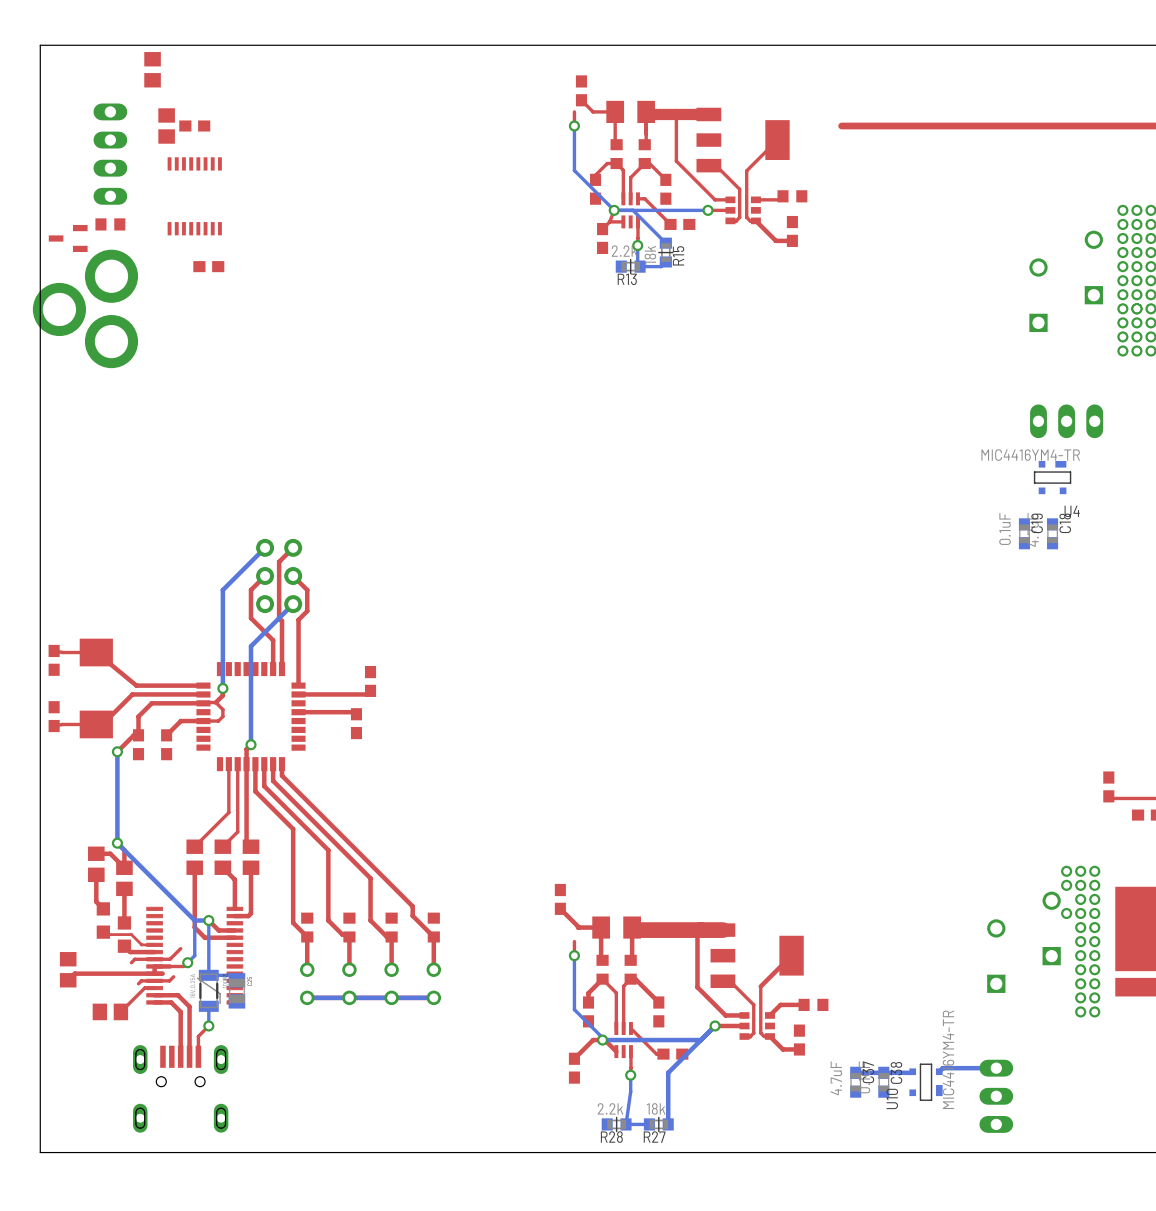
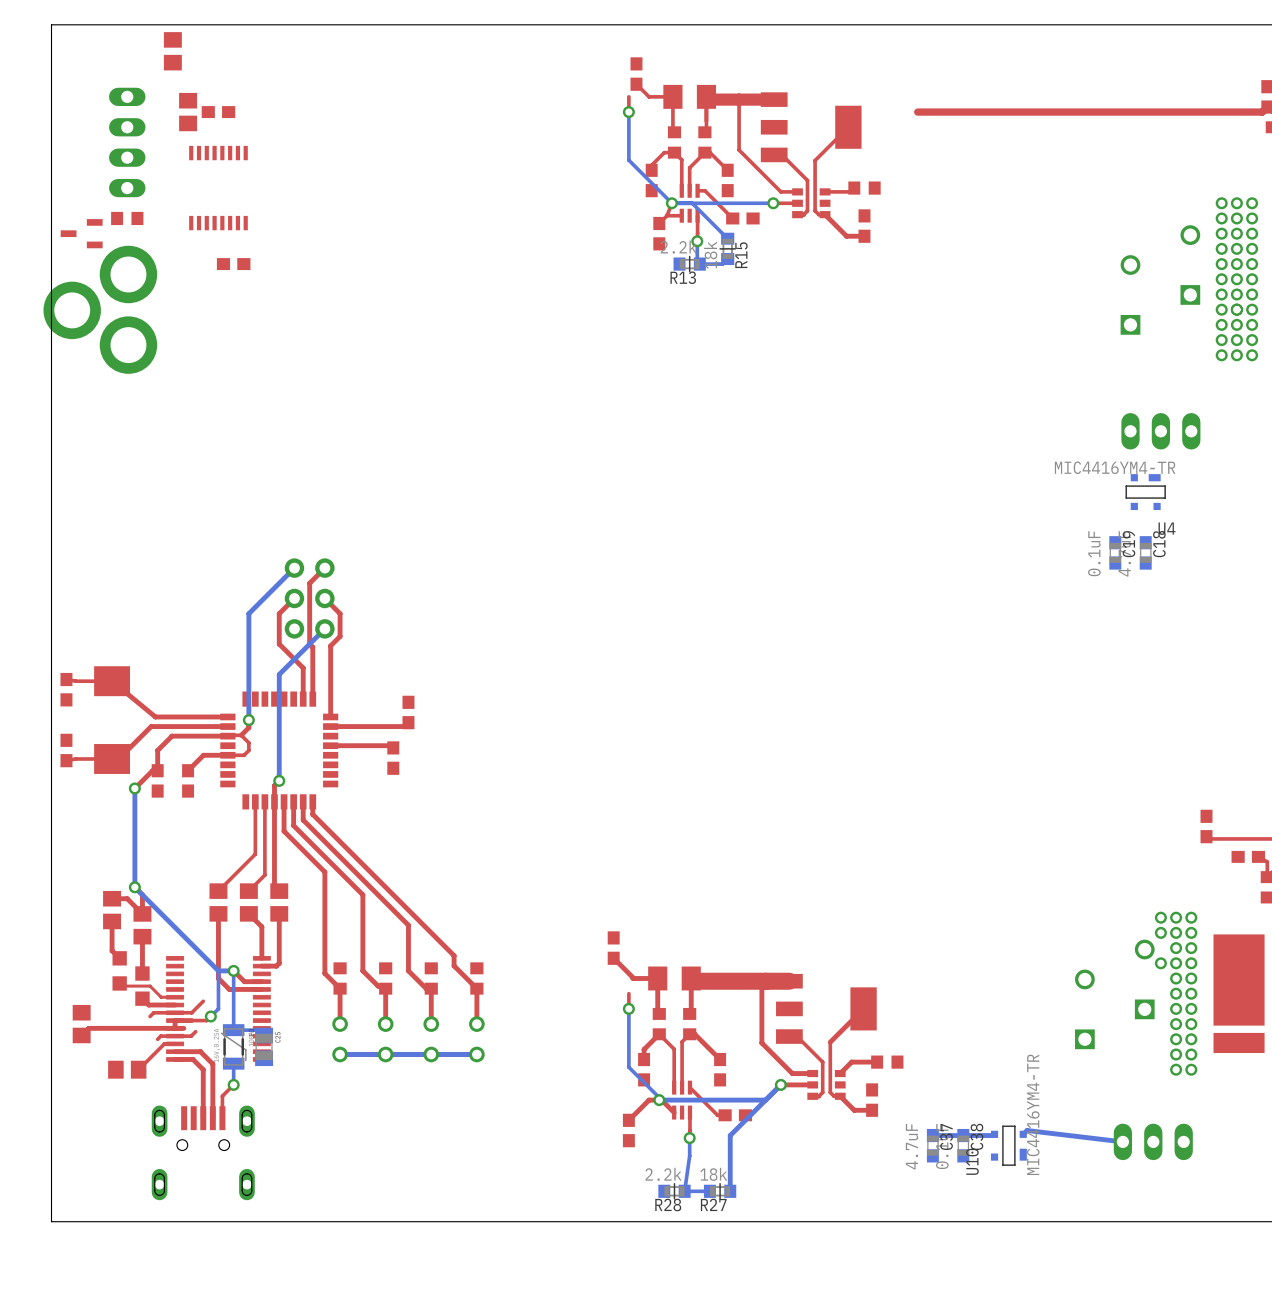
bottom track: (996, 1068) (942, 1068) -> (1122, 1141) (1027, 1130)
part rotation: 0° (996, 1096) -> 90° clockwise (1153, 1141)
part position: (996, 1096) -> (1153, 1141)

